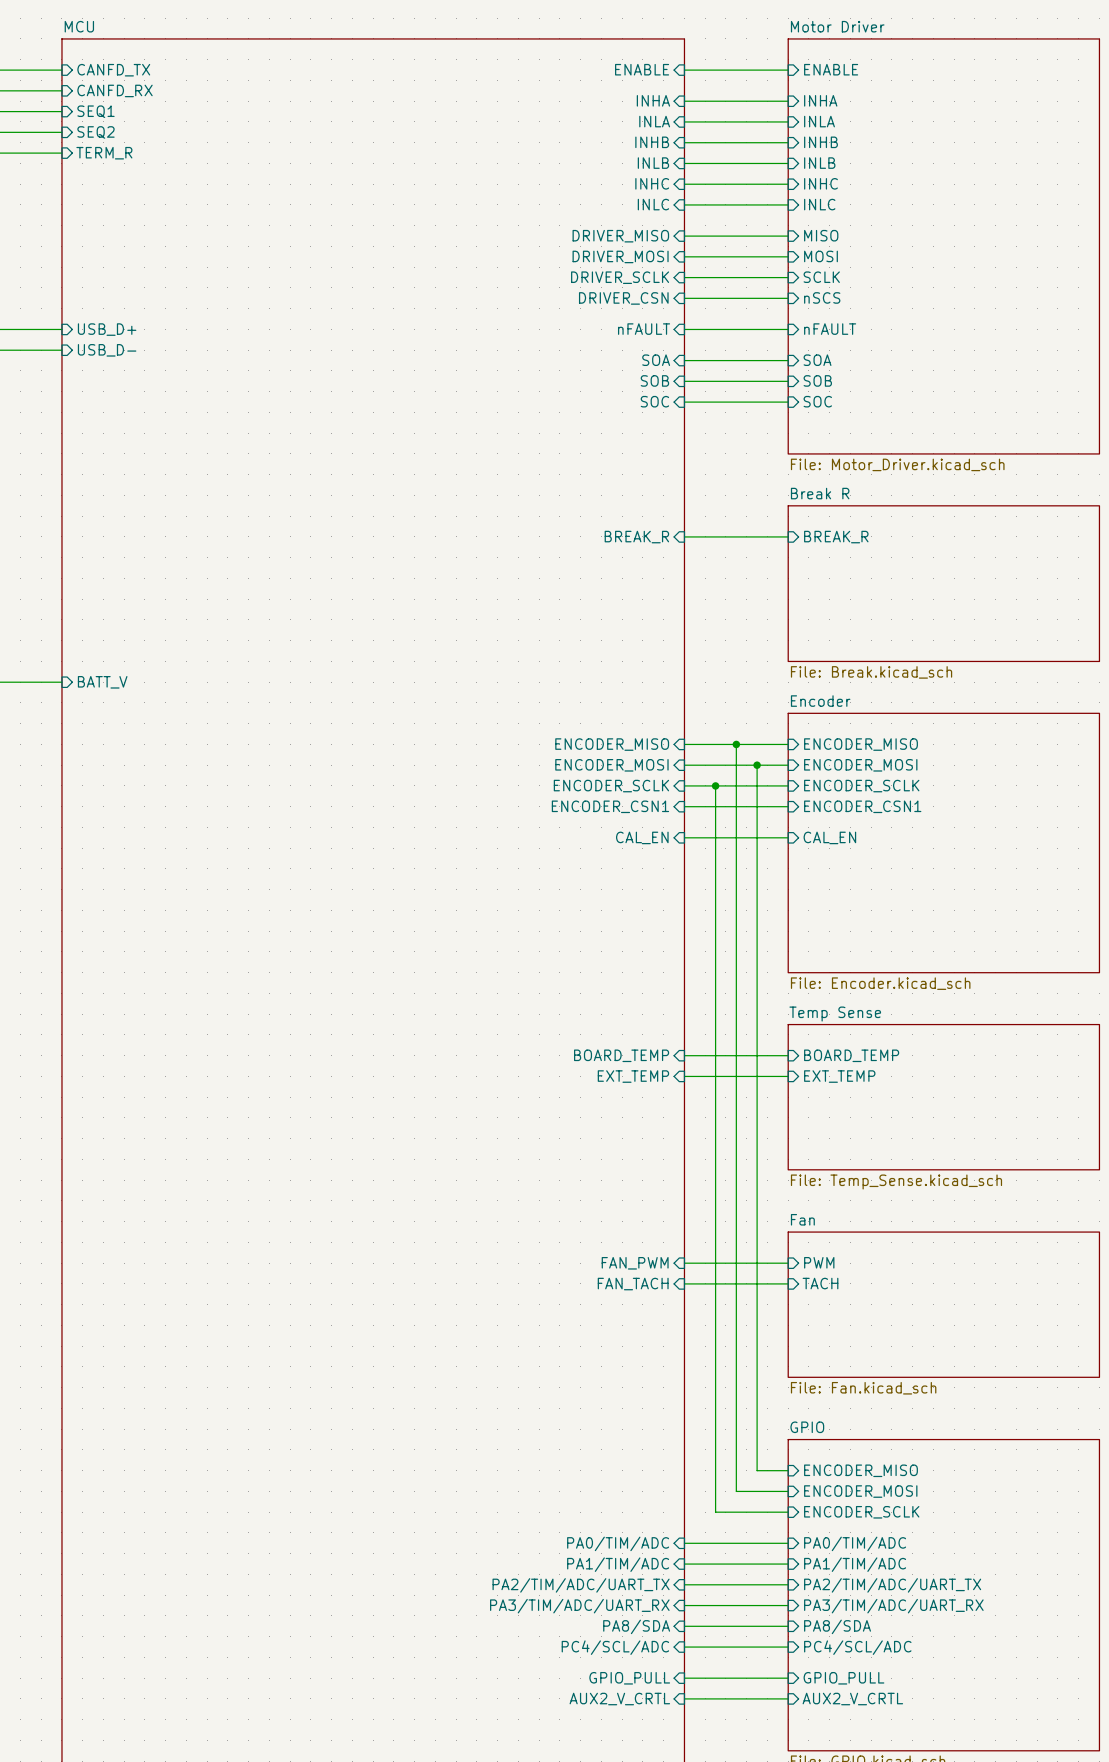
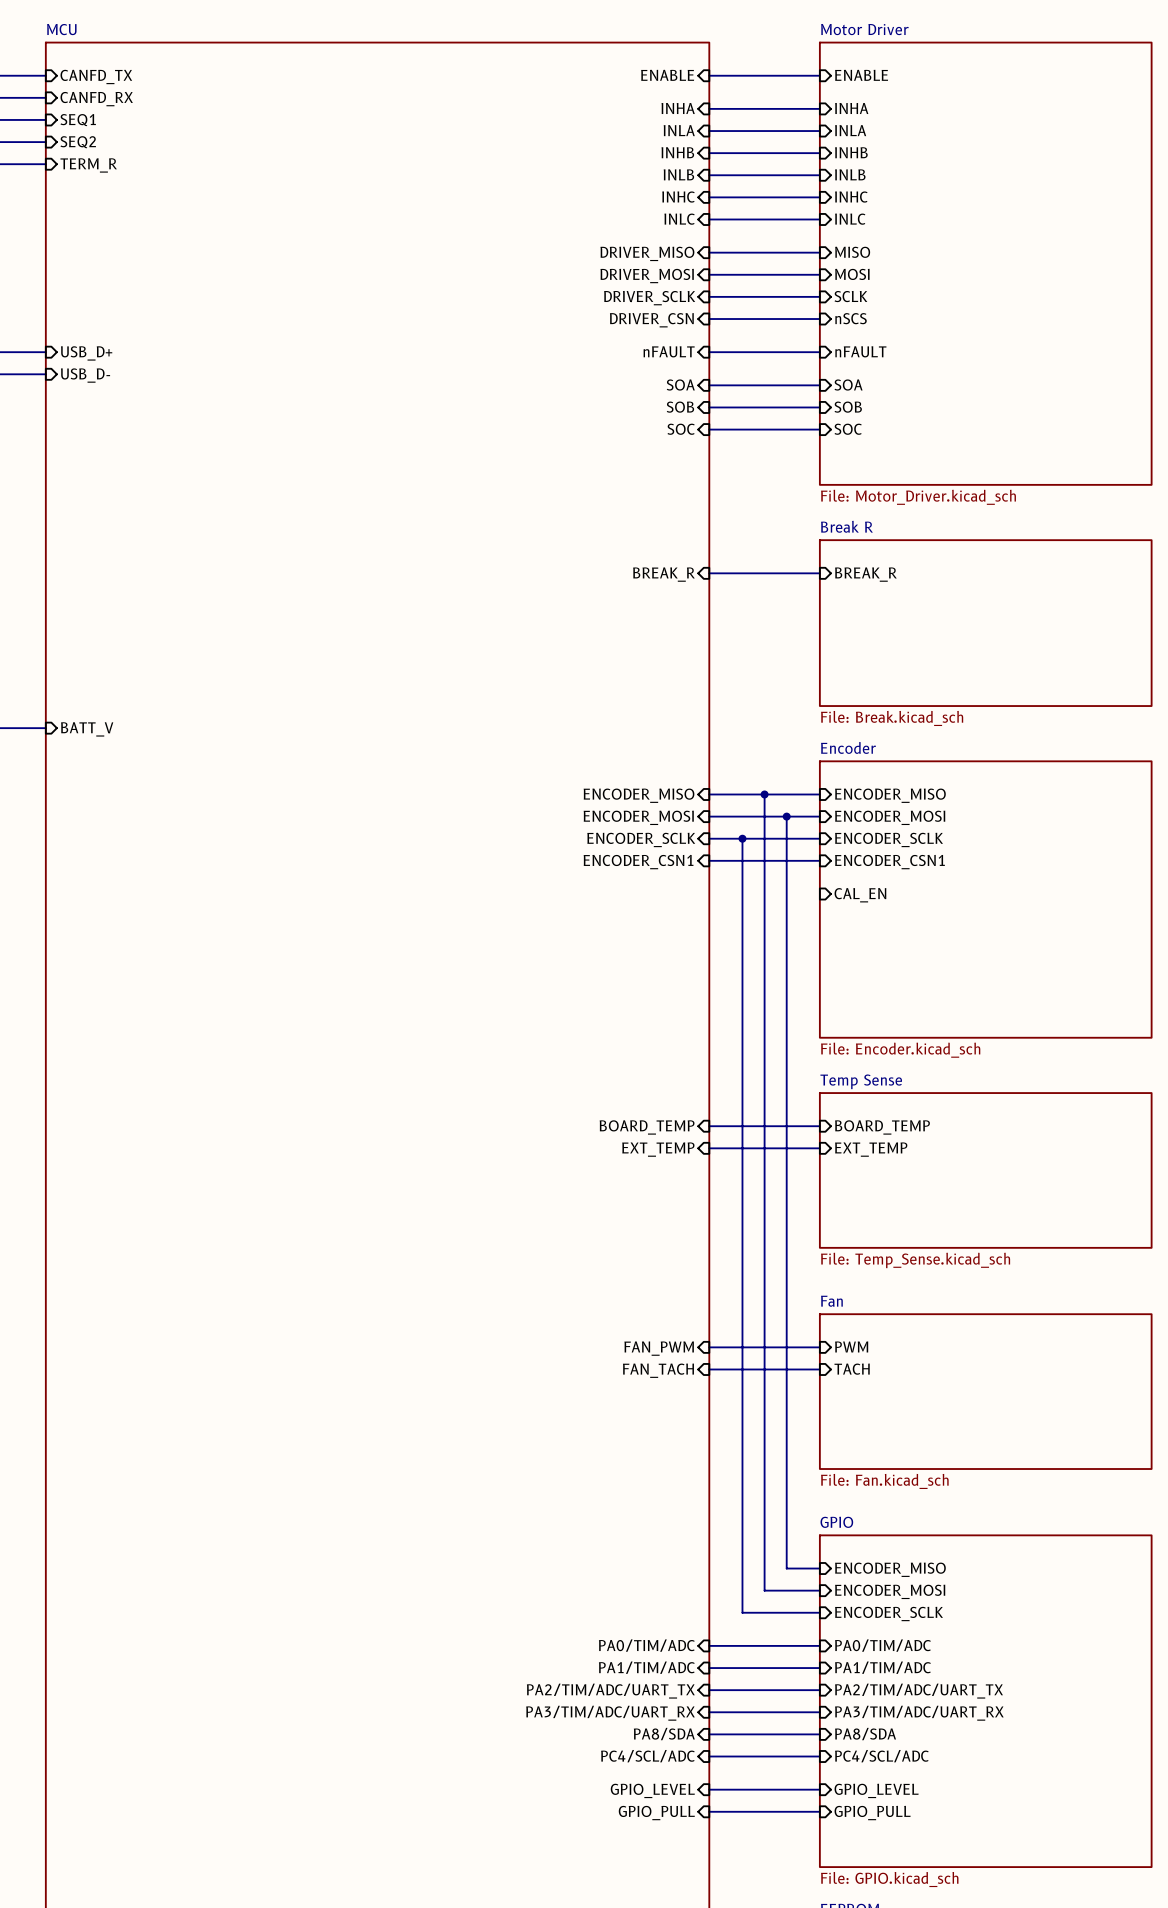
sheet pin: CAL_EN (642, 837) -> none
wire: (684, 837) (788, 837) -> none
sheet pin: GPIO_PULL (629, 1678) -> GPIO_LEVEL (652, 1790)
sheet pin: GPIO_PULL (843, 1678) -> GPIO_LEVEL (876, 1790)
sheet pin: AUX2_V_CRTL (619, 1699) -> GPIO_PULL (656, 1813)
sheet pin: AUX2_V_CRTL (852, 1699) -> GPIO_PULL (872, 1813)

